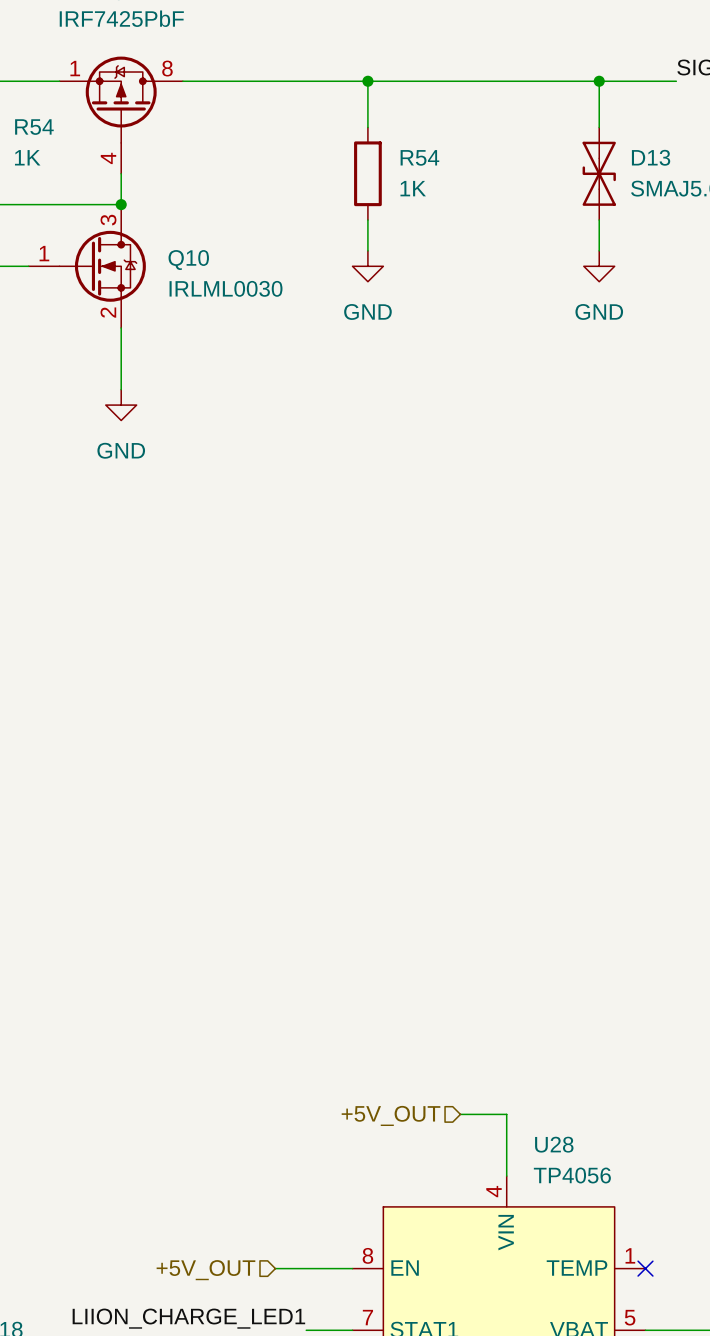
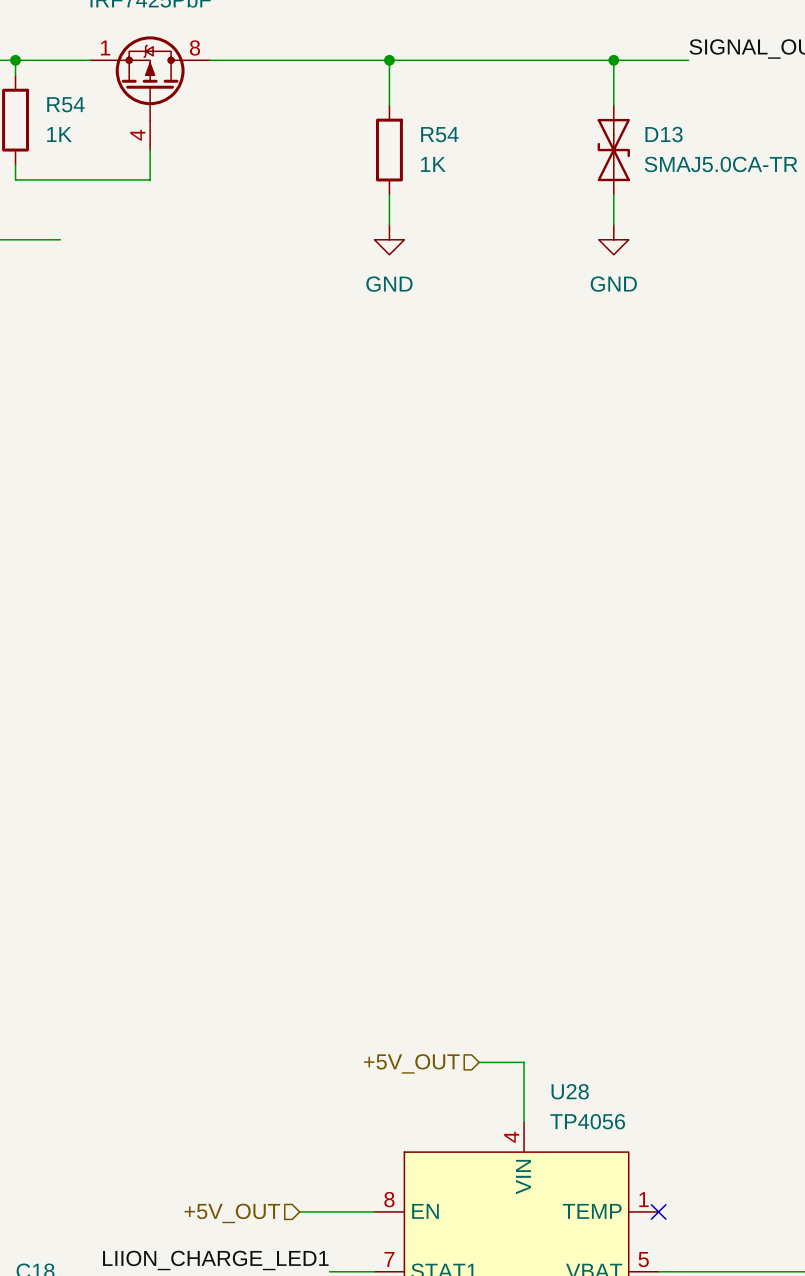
junction: (121, 204) -> none
Q10: IRLML0030 (87, 266) -> none
wire: (121, 327) (121, 389) -> none
power symbol: GND (121, 405) -> none

